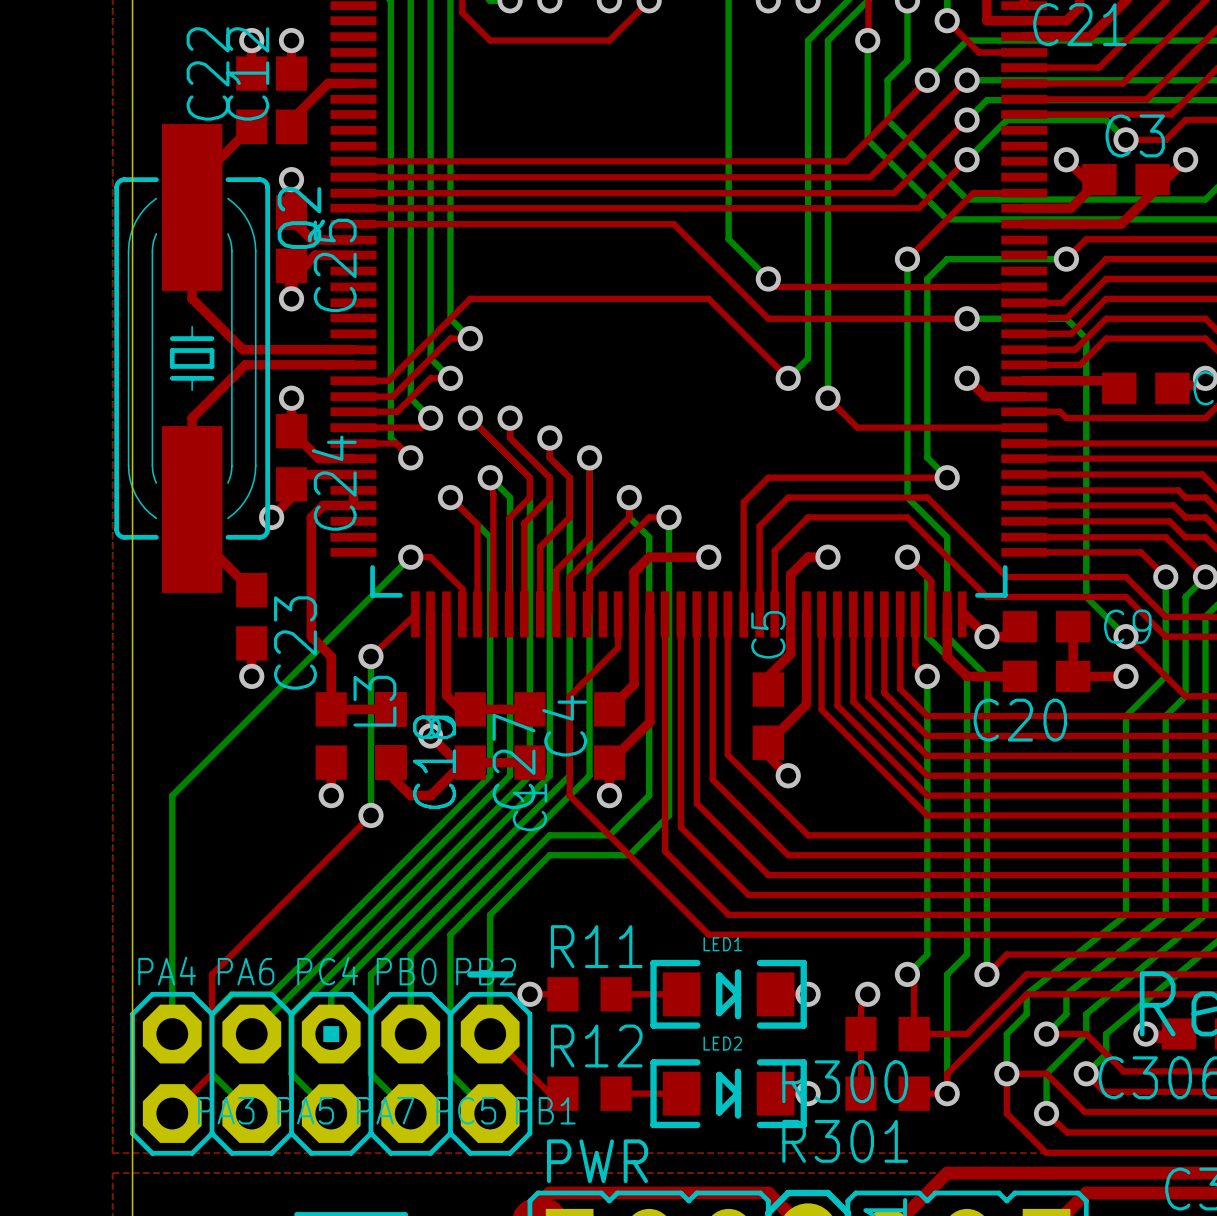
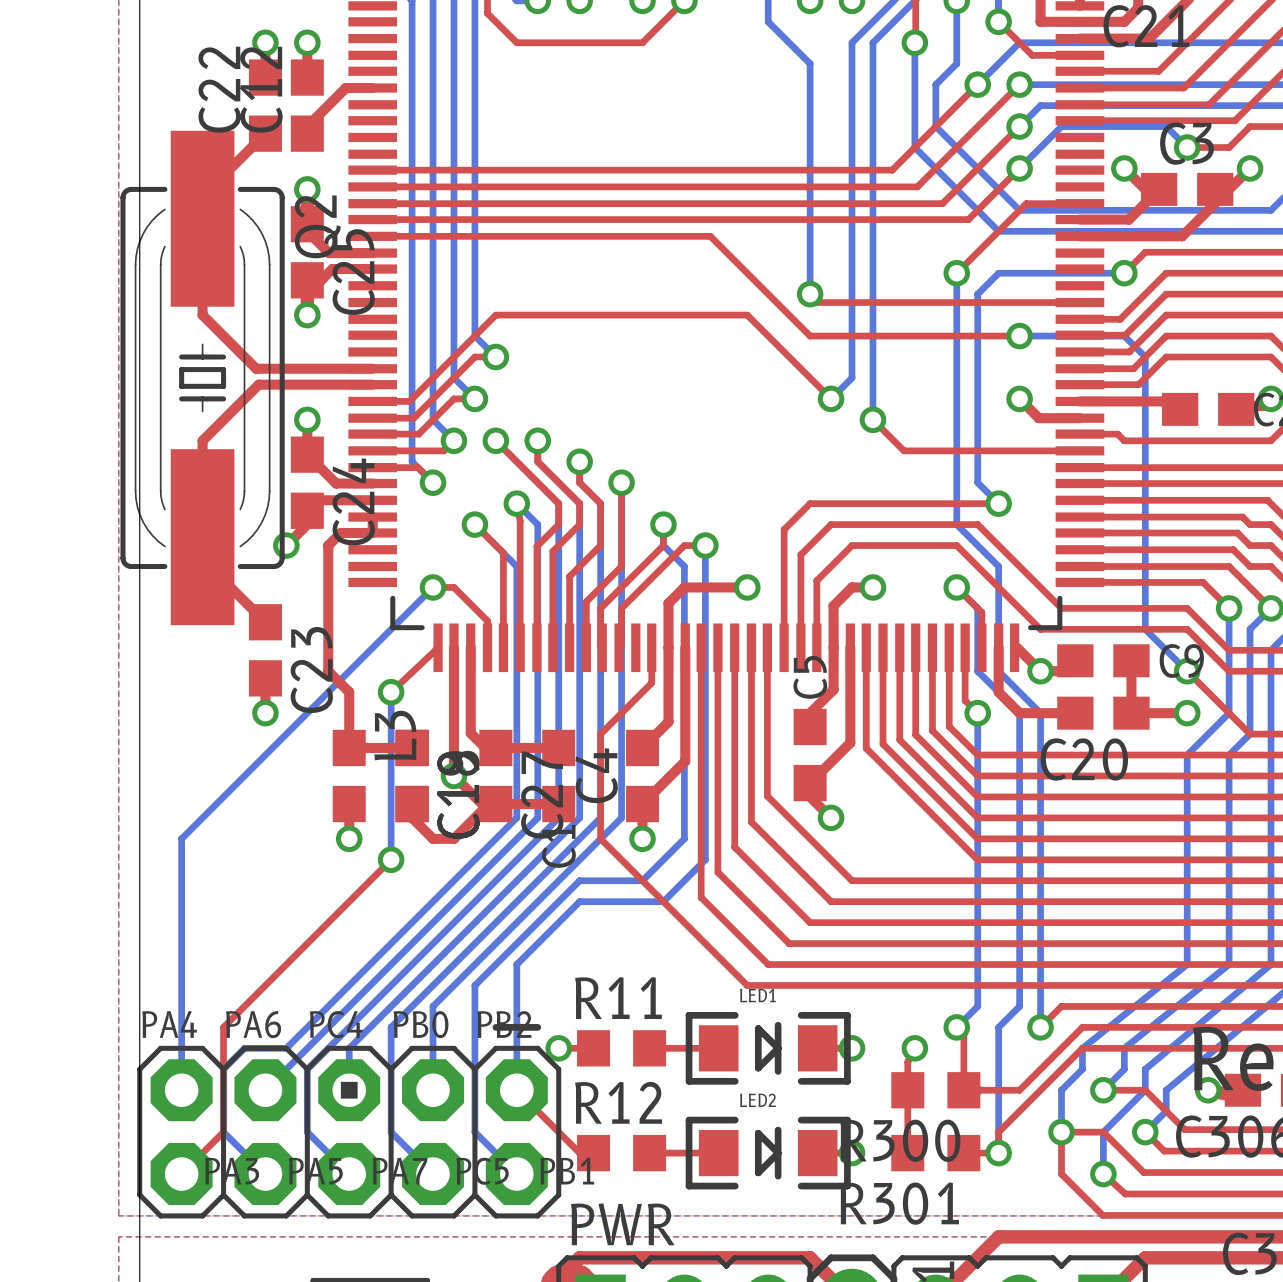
bottom track: (728, 20) (728, 239) (768, 279) -> (768, 21) (810, 63) (810, 294)

